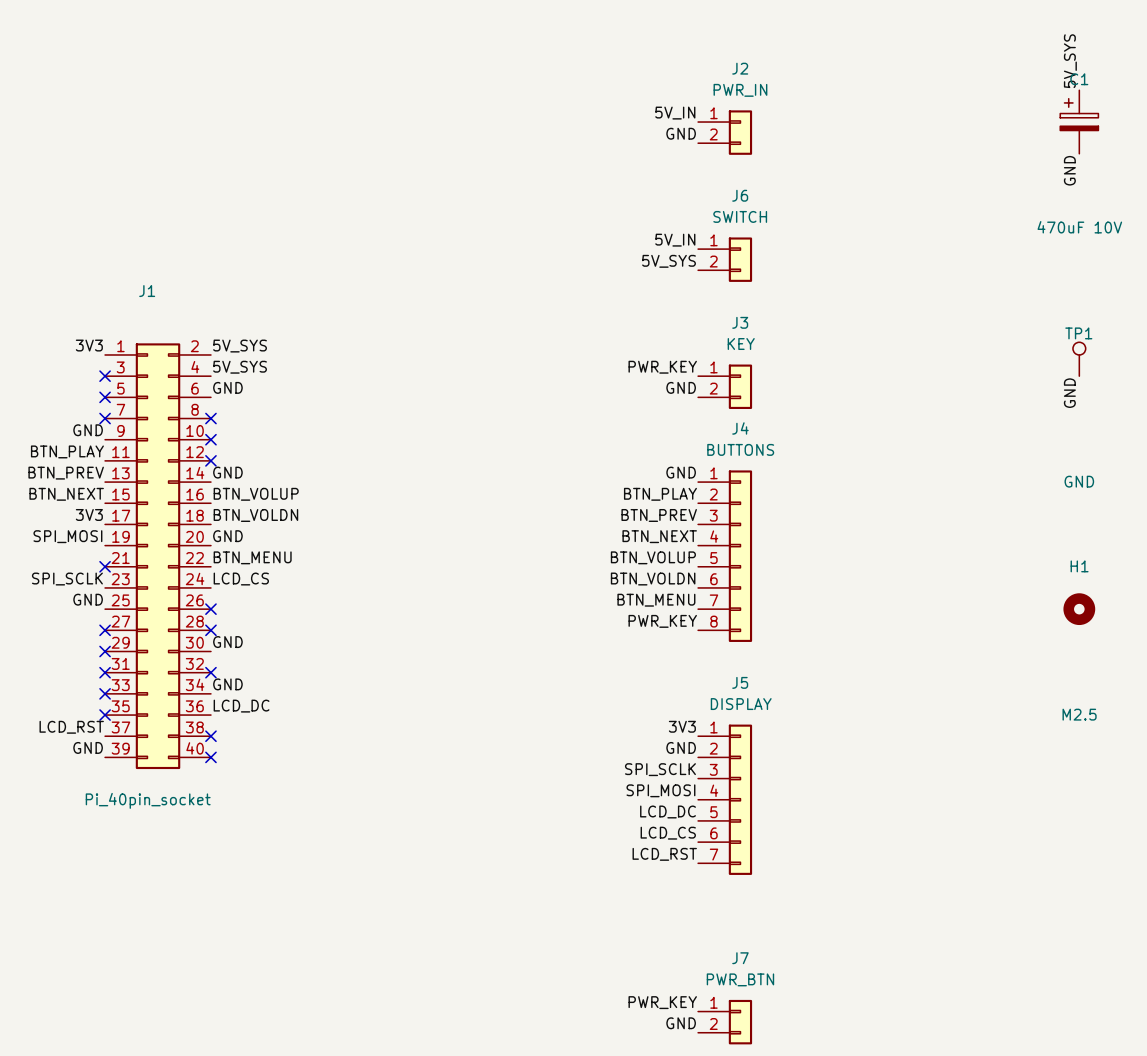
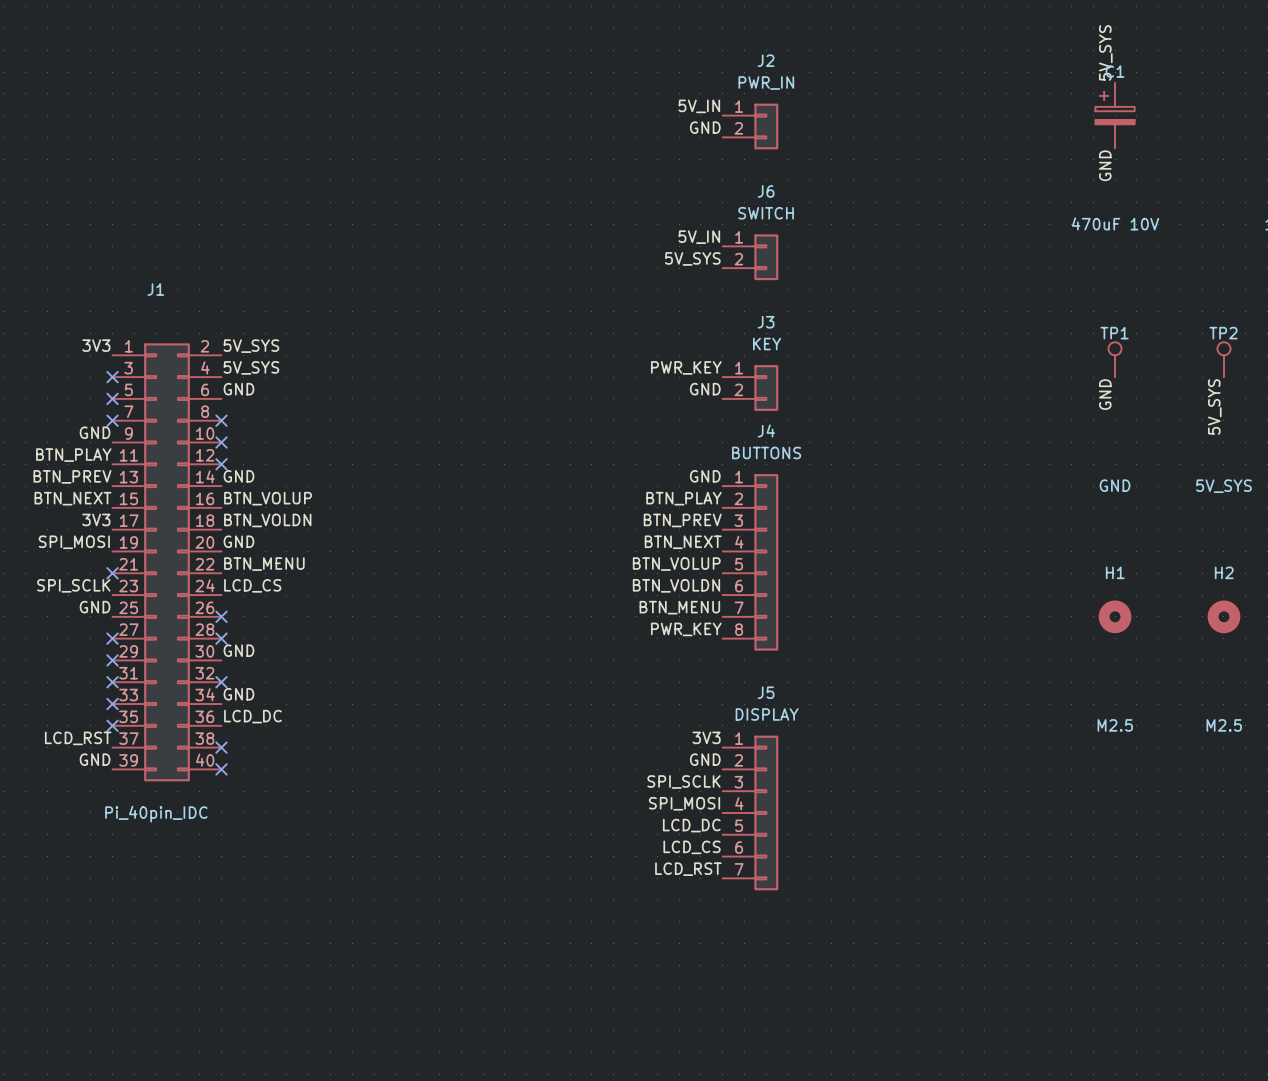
J1 value: Pi_40pin_socket (148, 800) -> Pi_40pin_IDC (156, 814)
label: PWR_KEY (662, 1002) -> none
J7: PWR_BTN (725, 1022) -> none
label: GND (681, 1023) -> none

